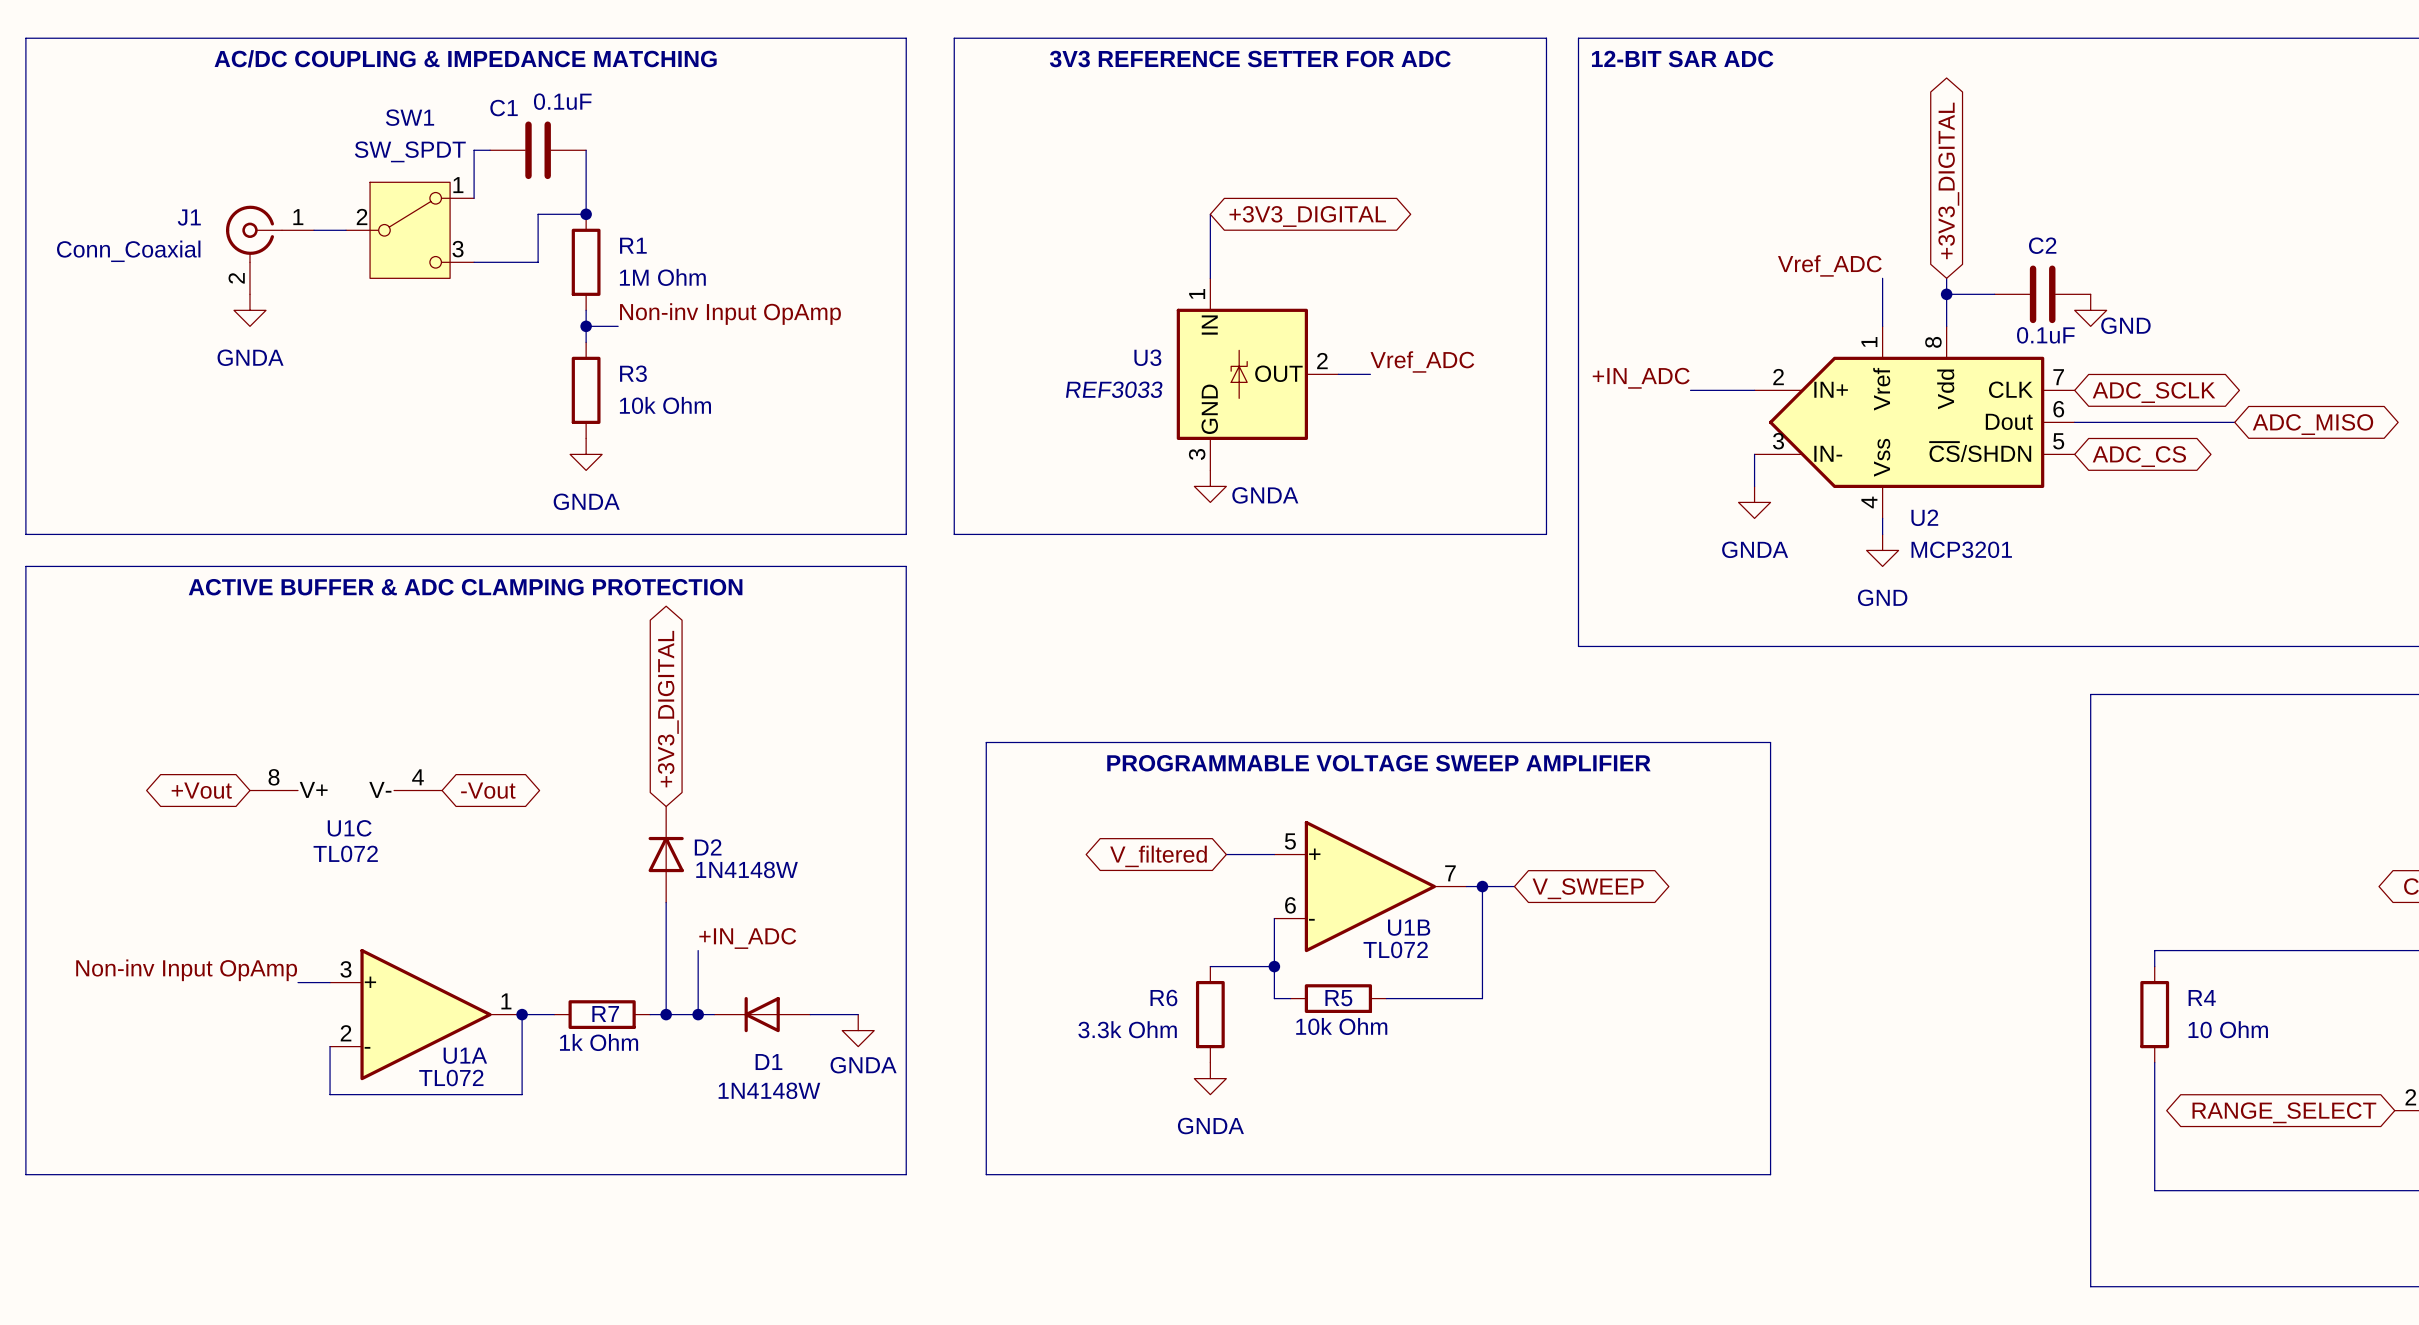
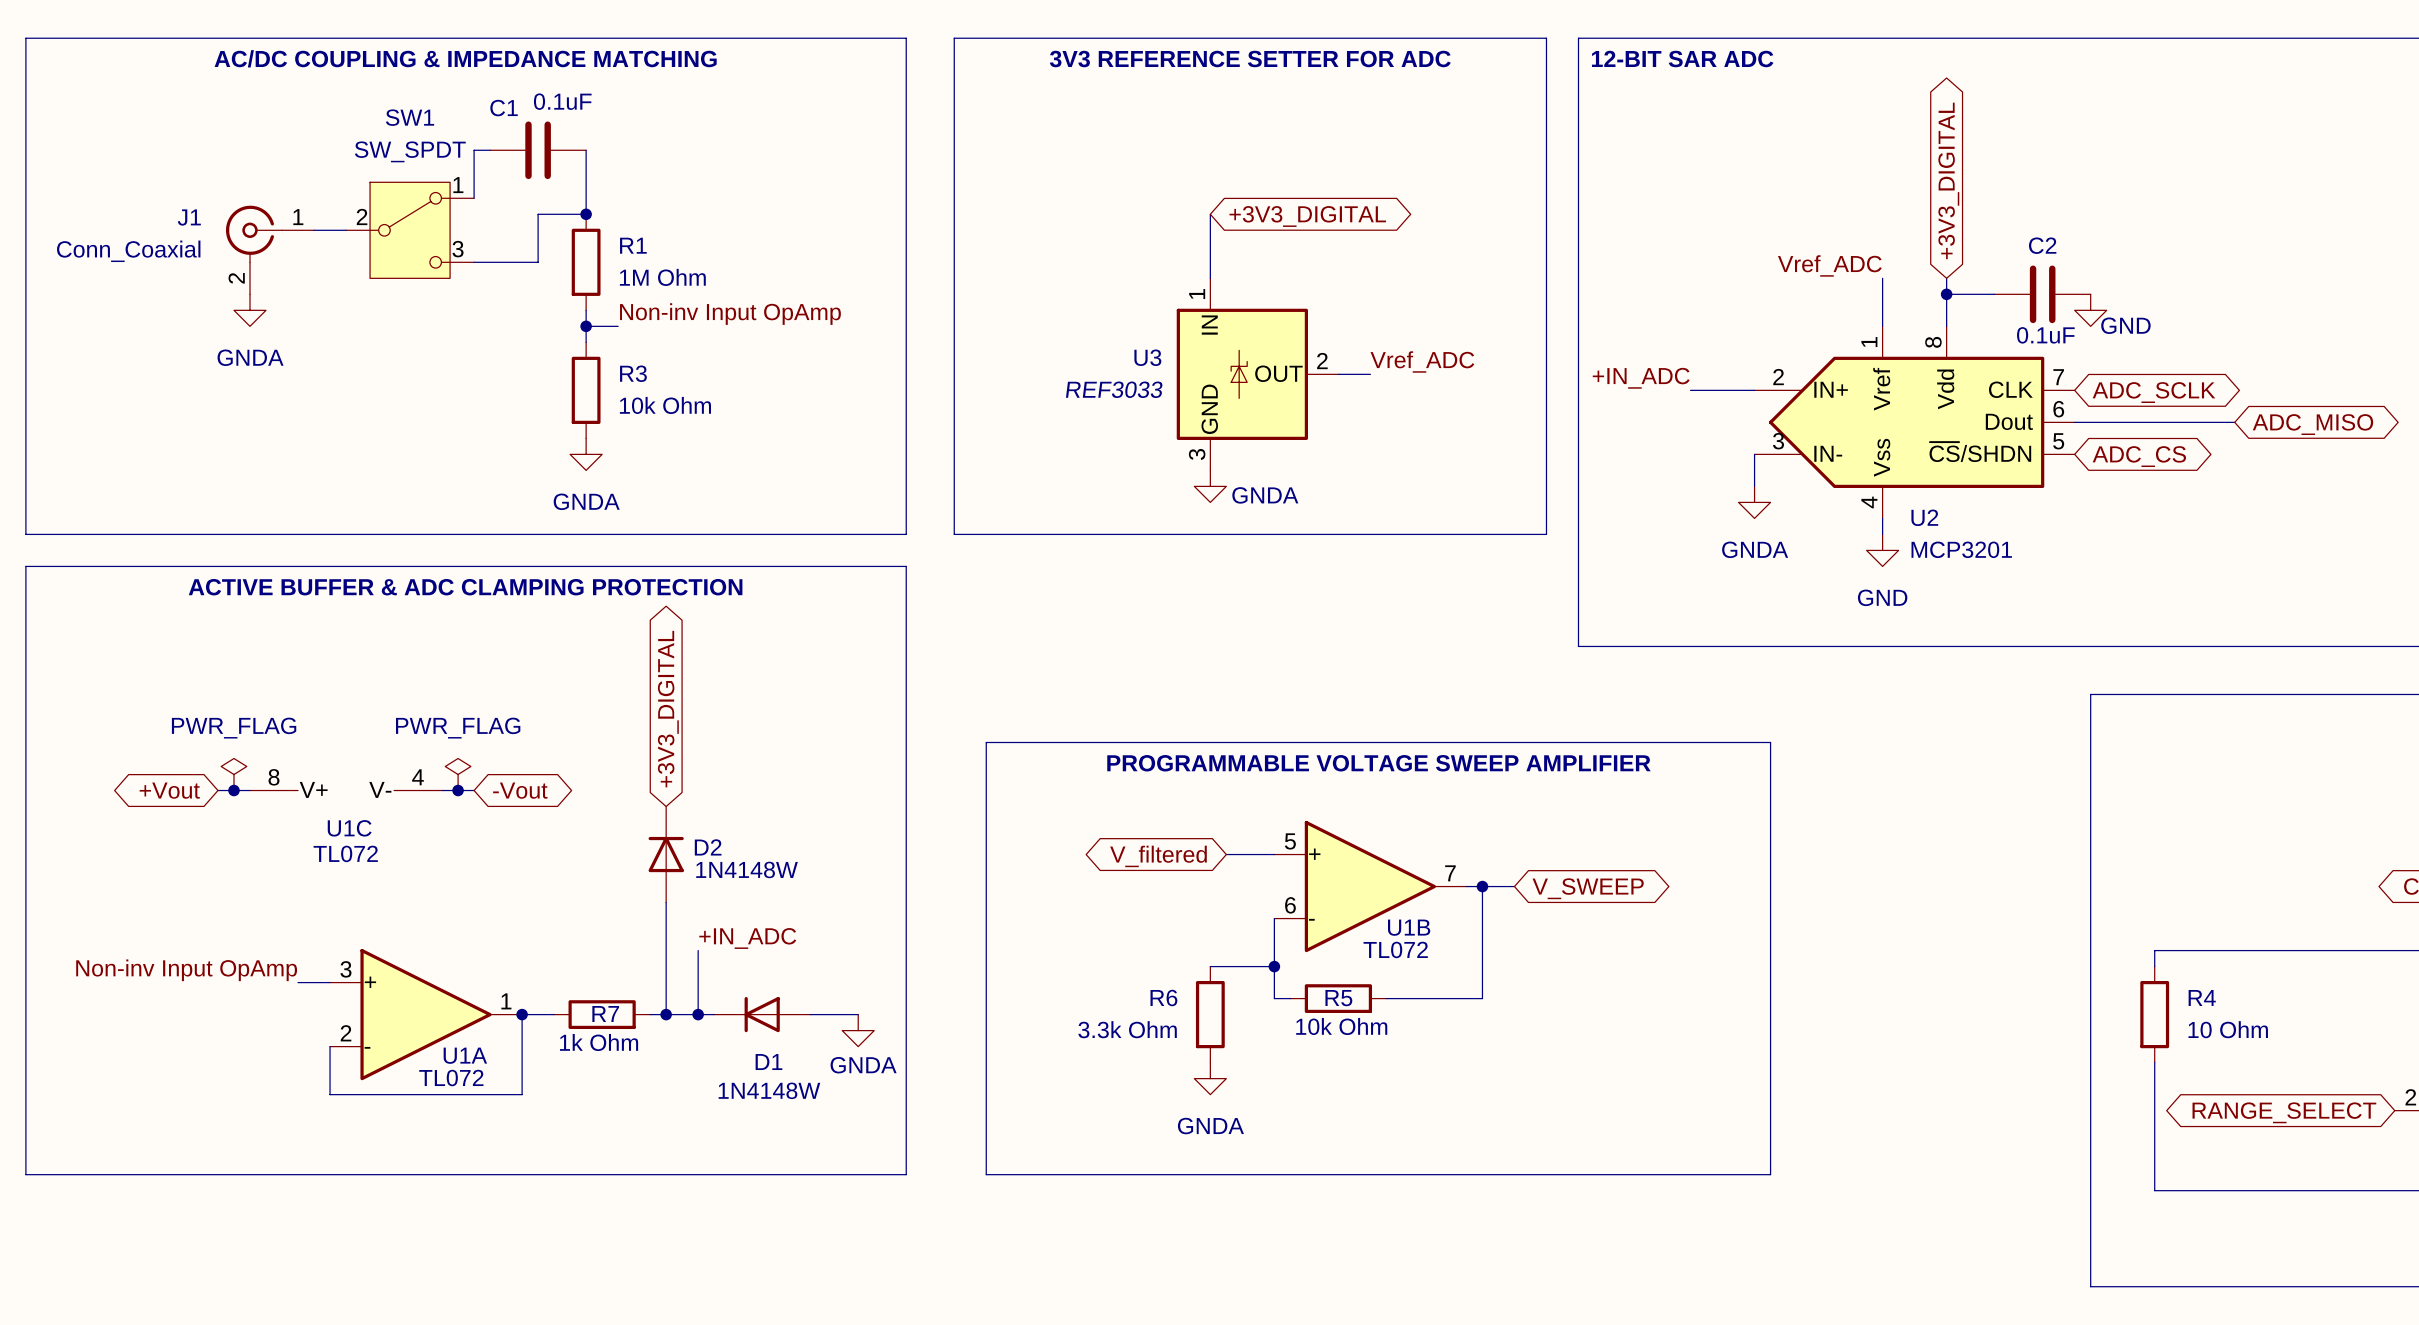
power symbol: none -> PWR_FLAG (233, 774)
power symbol: none -> PWR_FLAG (458, 774)
global label position: +Vout (201, 790) -> +Vout (169, 790)
wire: none -> (217, 790) (250, 790)
junction: none -> (233, 790)
wire: none -> (442, 790) (474, 790)
junction: none -> (458, 790)
global label position: -Vout (488, 790) -> -Vout (520, 790)

